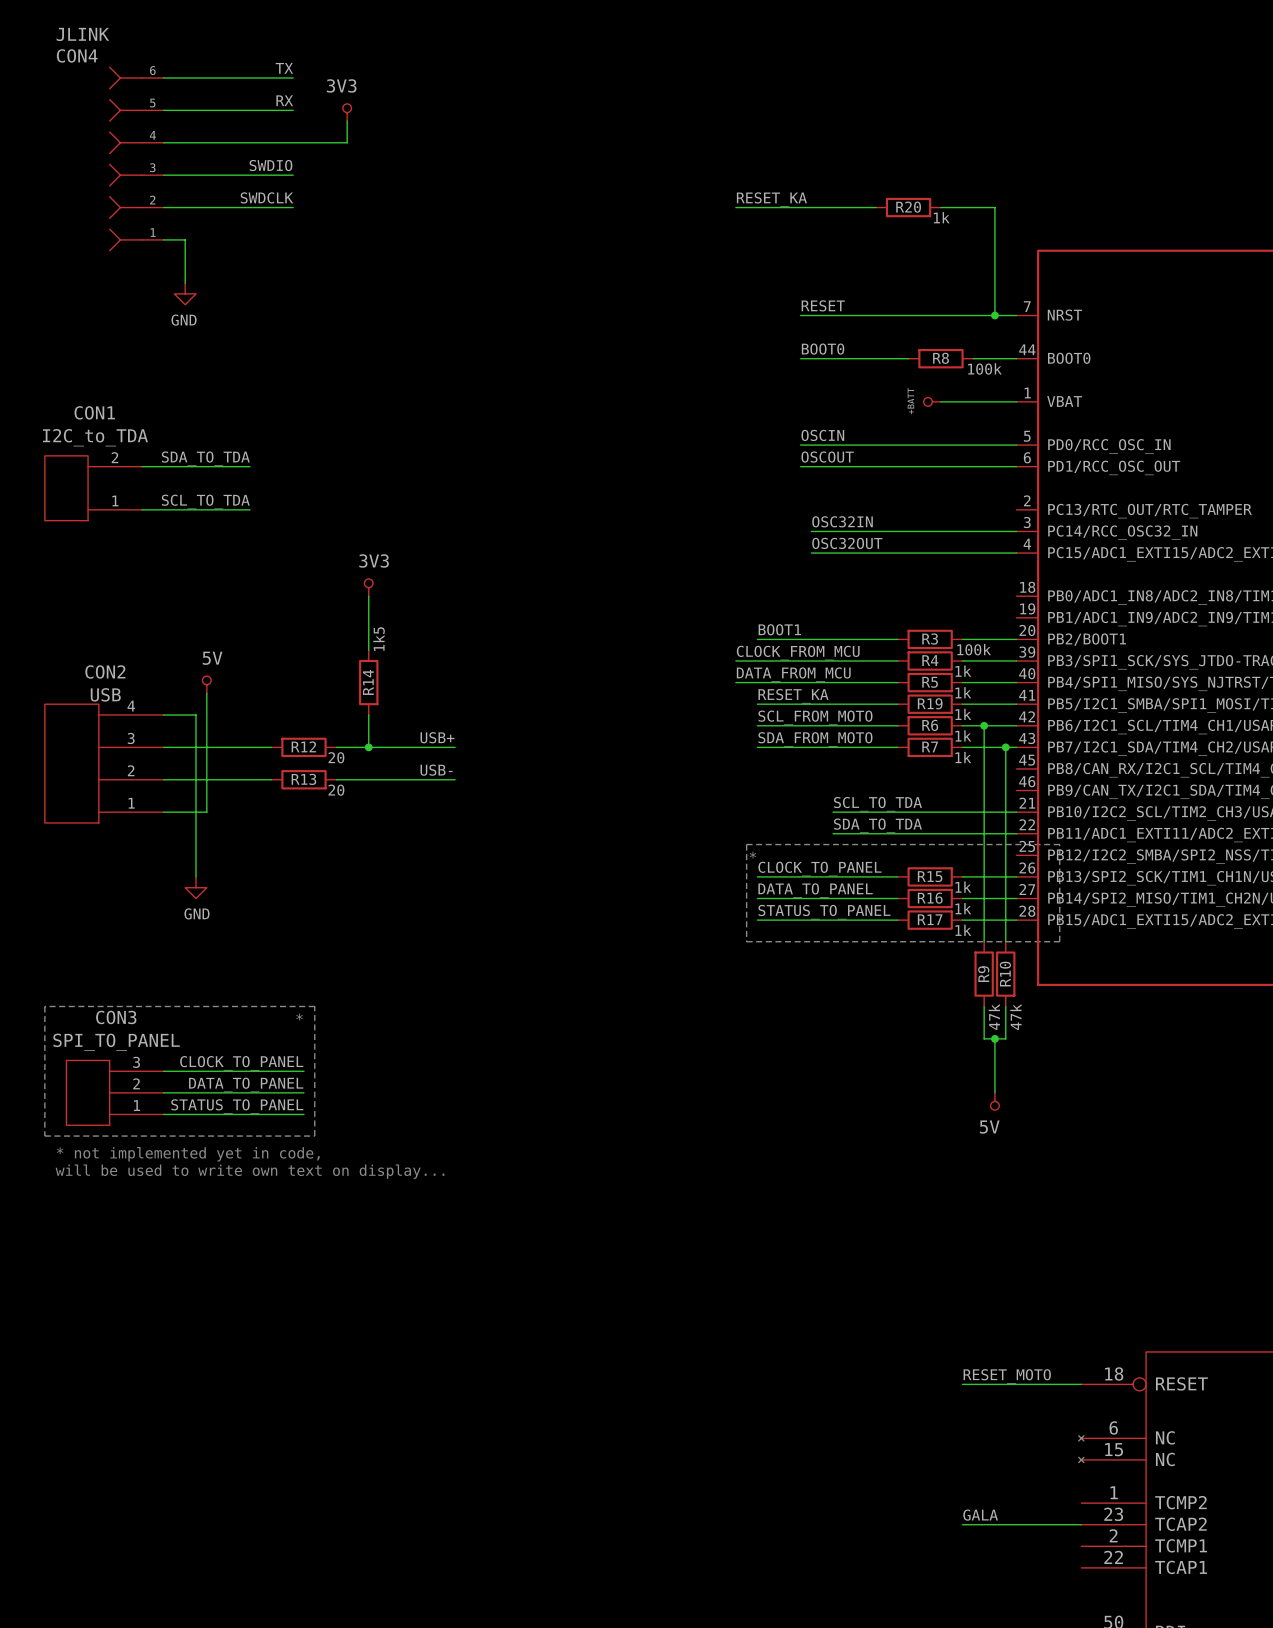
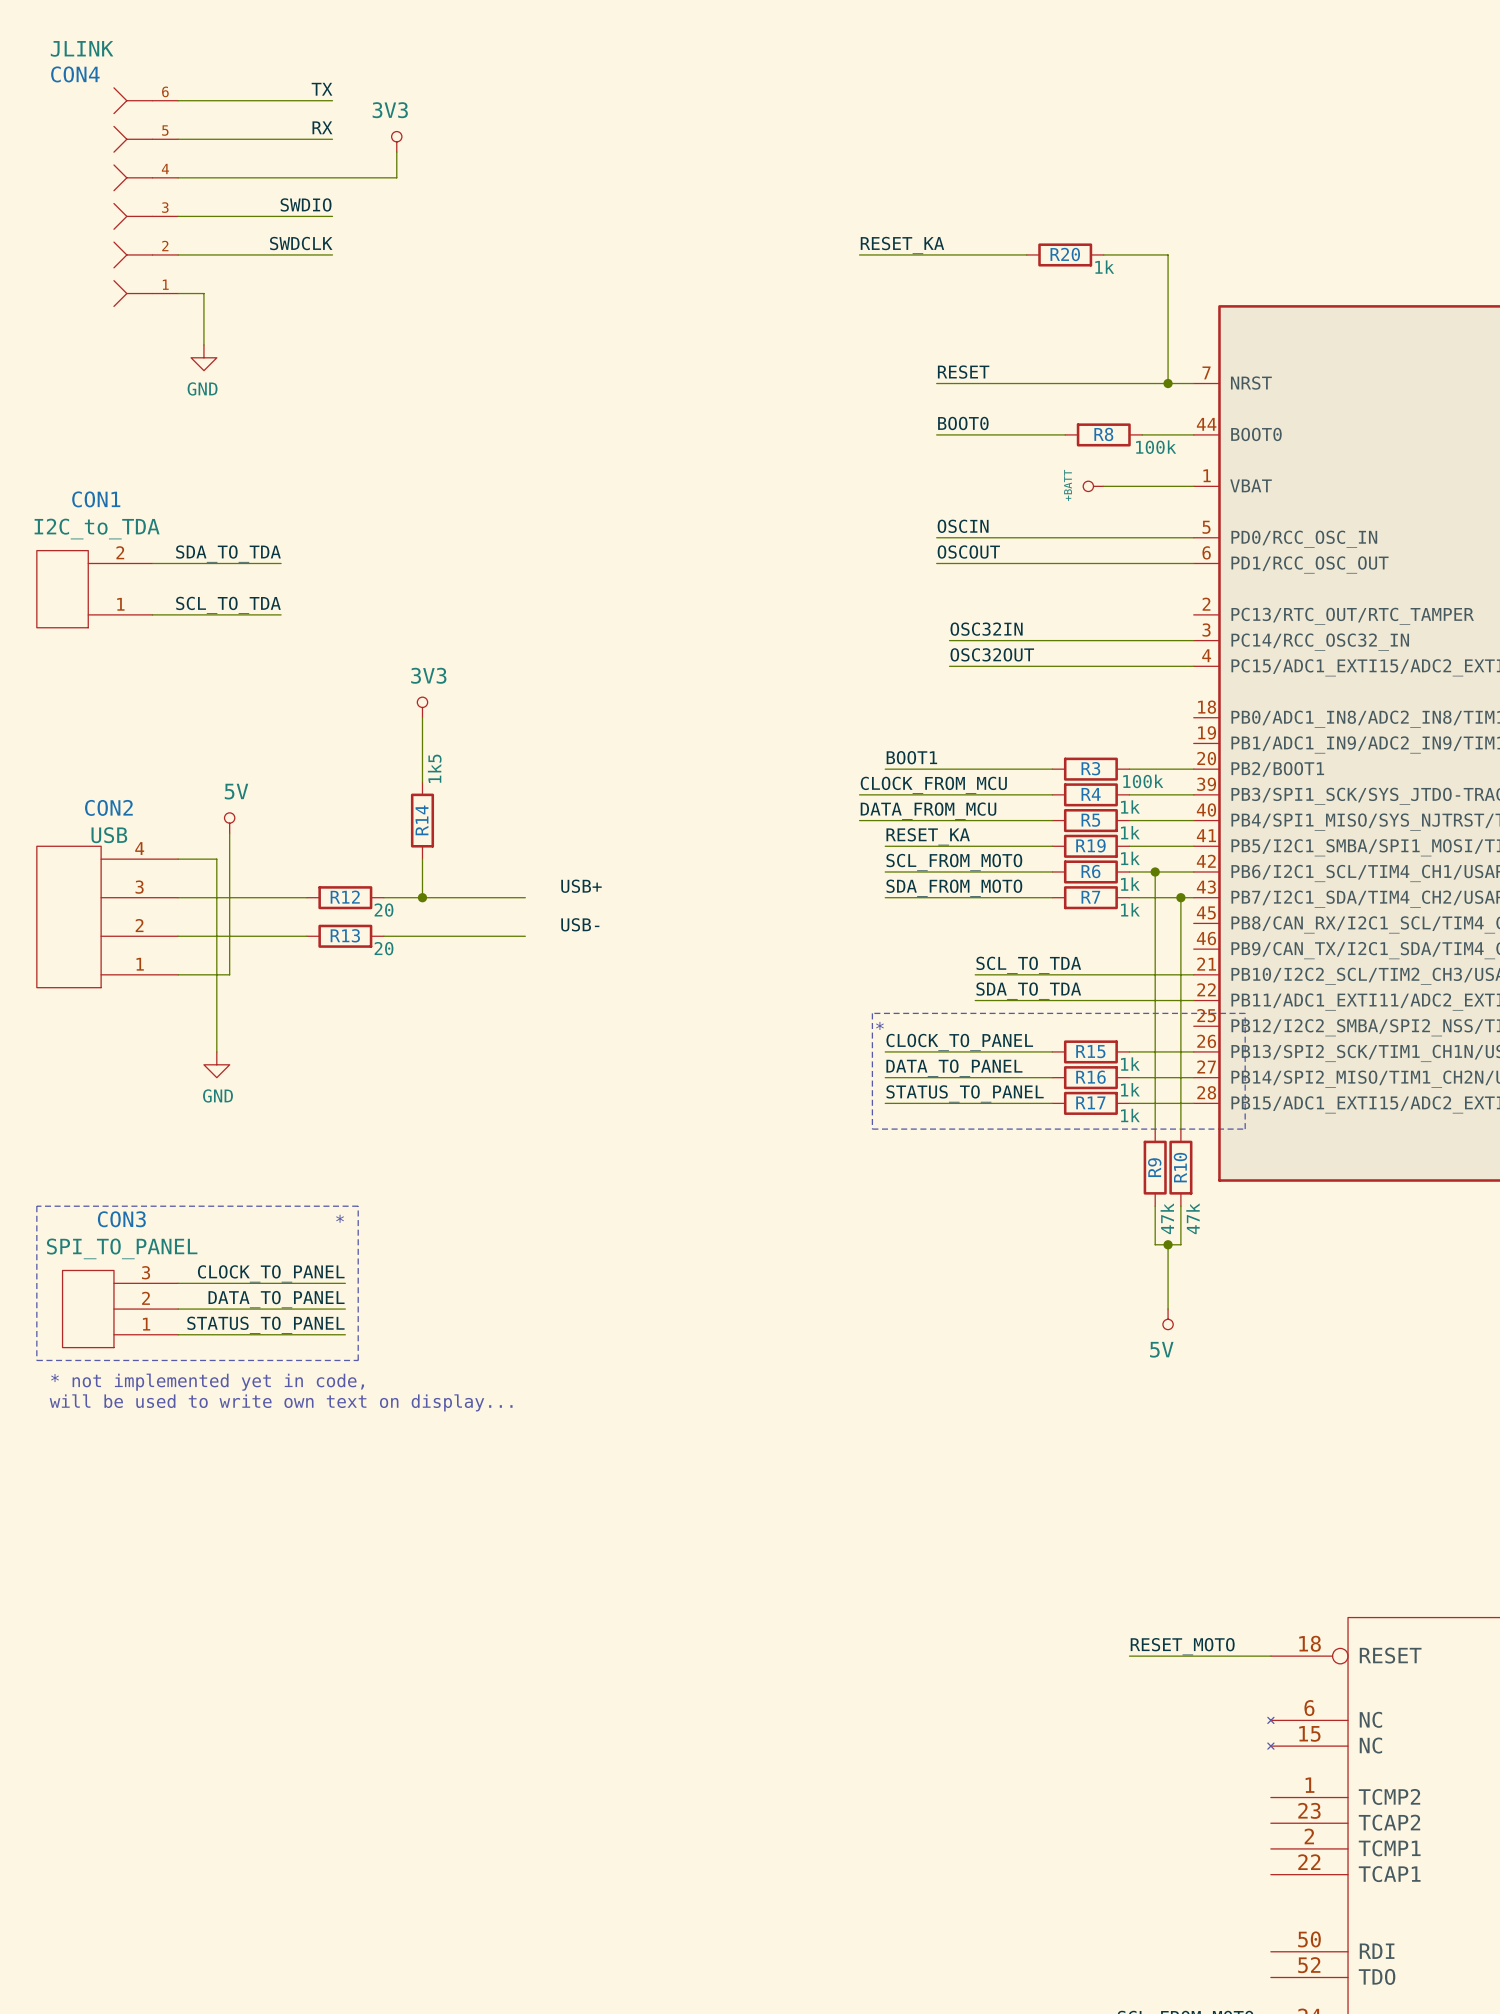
label position: USB+ (437, 737) -> USB+ (581, 886)
label position: USB- (436, 770) -> USB- (580, 924)
label: GALA (980, 1515) -> none
wire: (962, 1524) (1081, 1524) -> none

